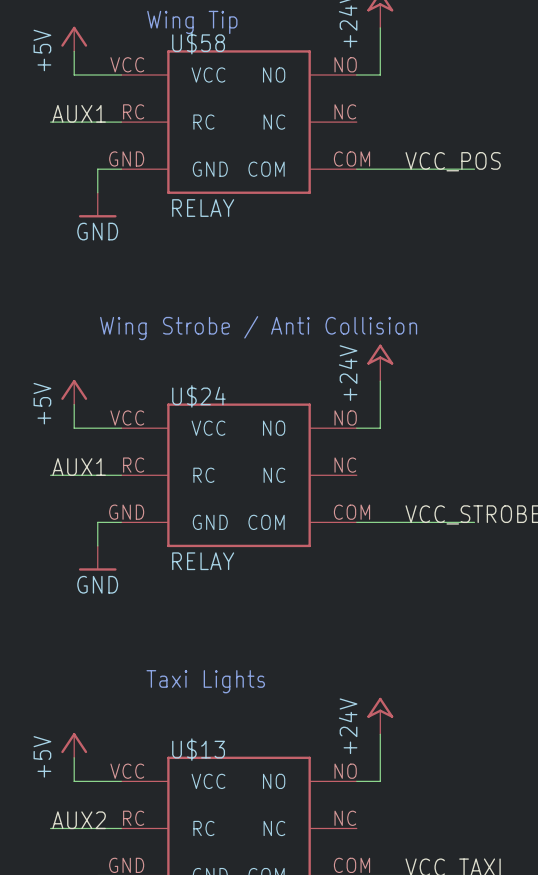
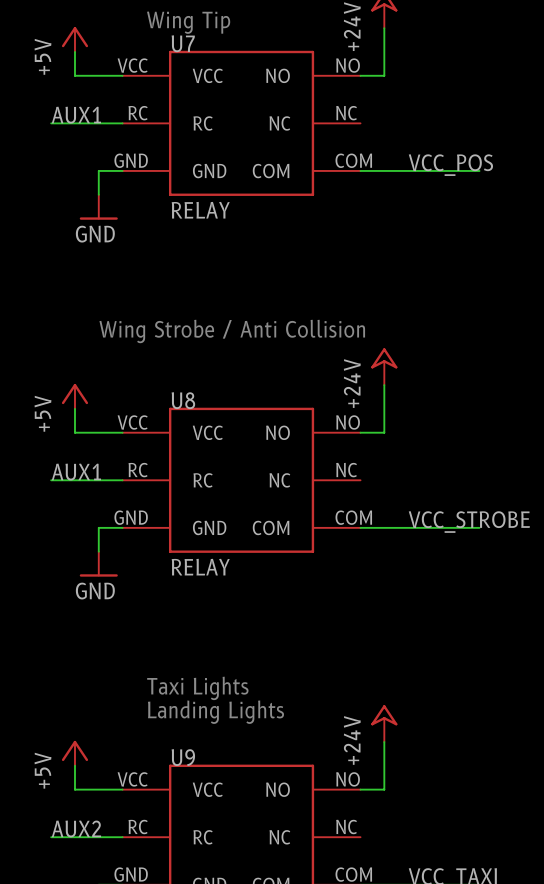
U$58 name: U$58 (198, 43) -> U7 (183, 43)
U$24 name: U$24 (198, 396) -> U8 (183, 400)
text: none -> Landing Lights (215, 712)
U$13 name: U$13 (198, 749) -> U9 (183, 757)

